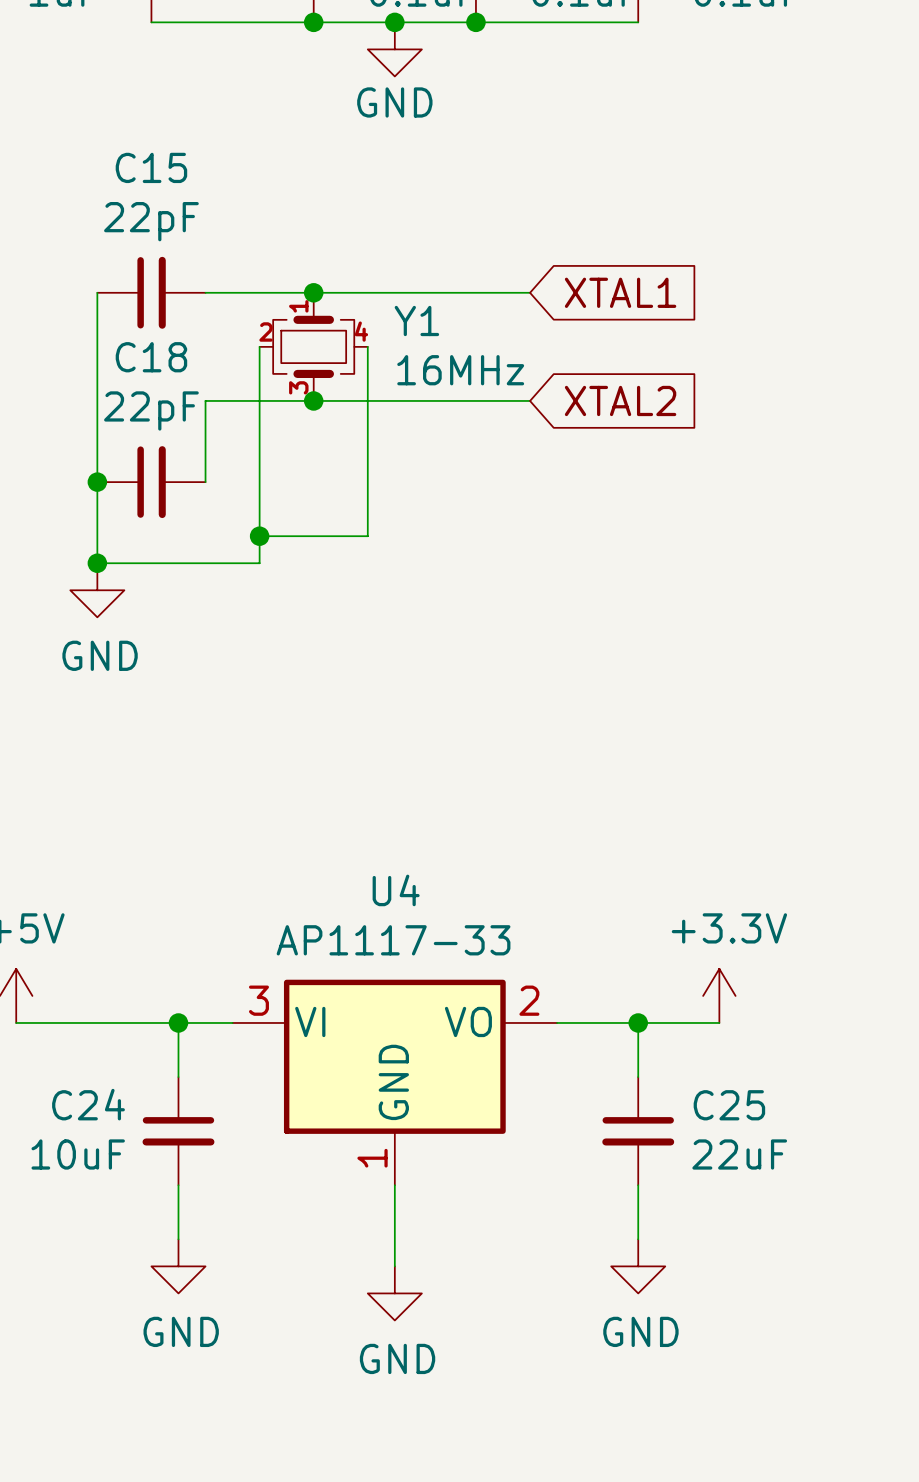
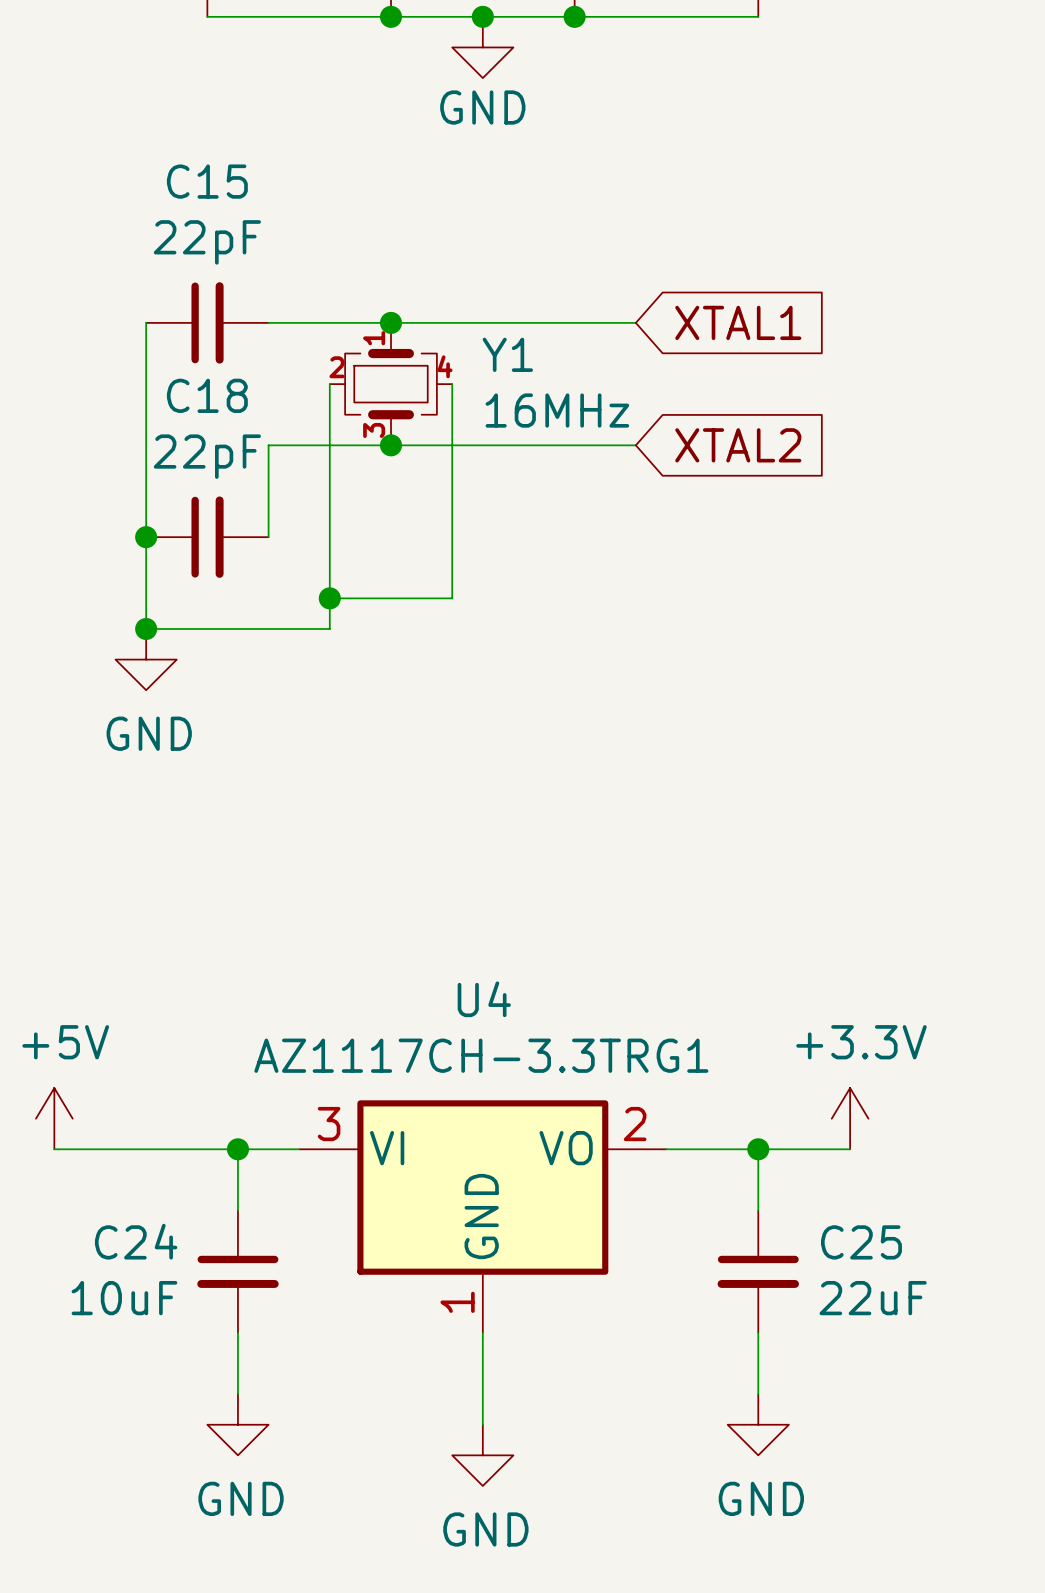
U4 value: AP1117-33 (393, 940) -> AZ1117CH-3.3TRG1 (481, 1055)

